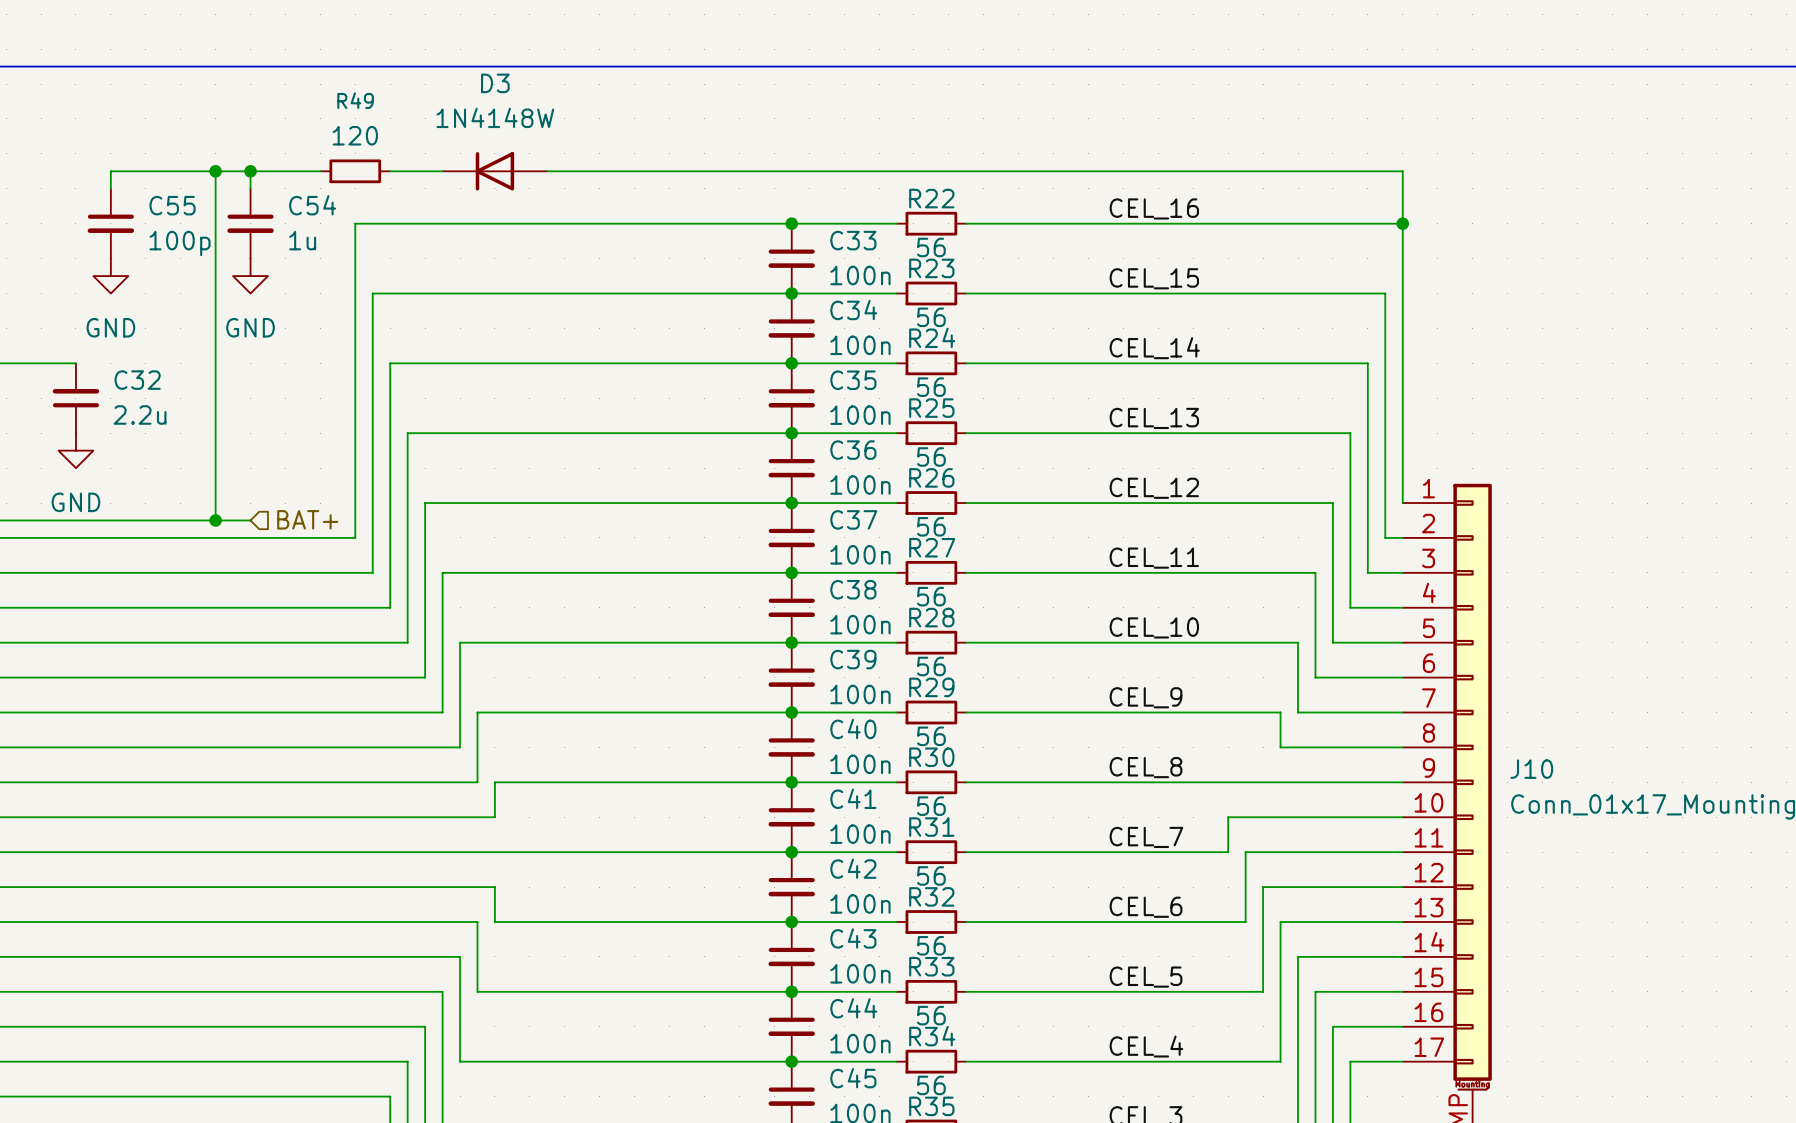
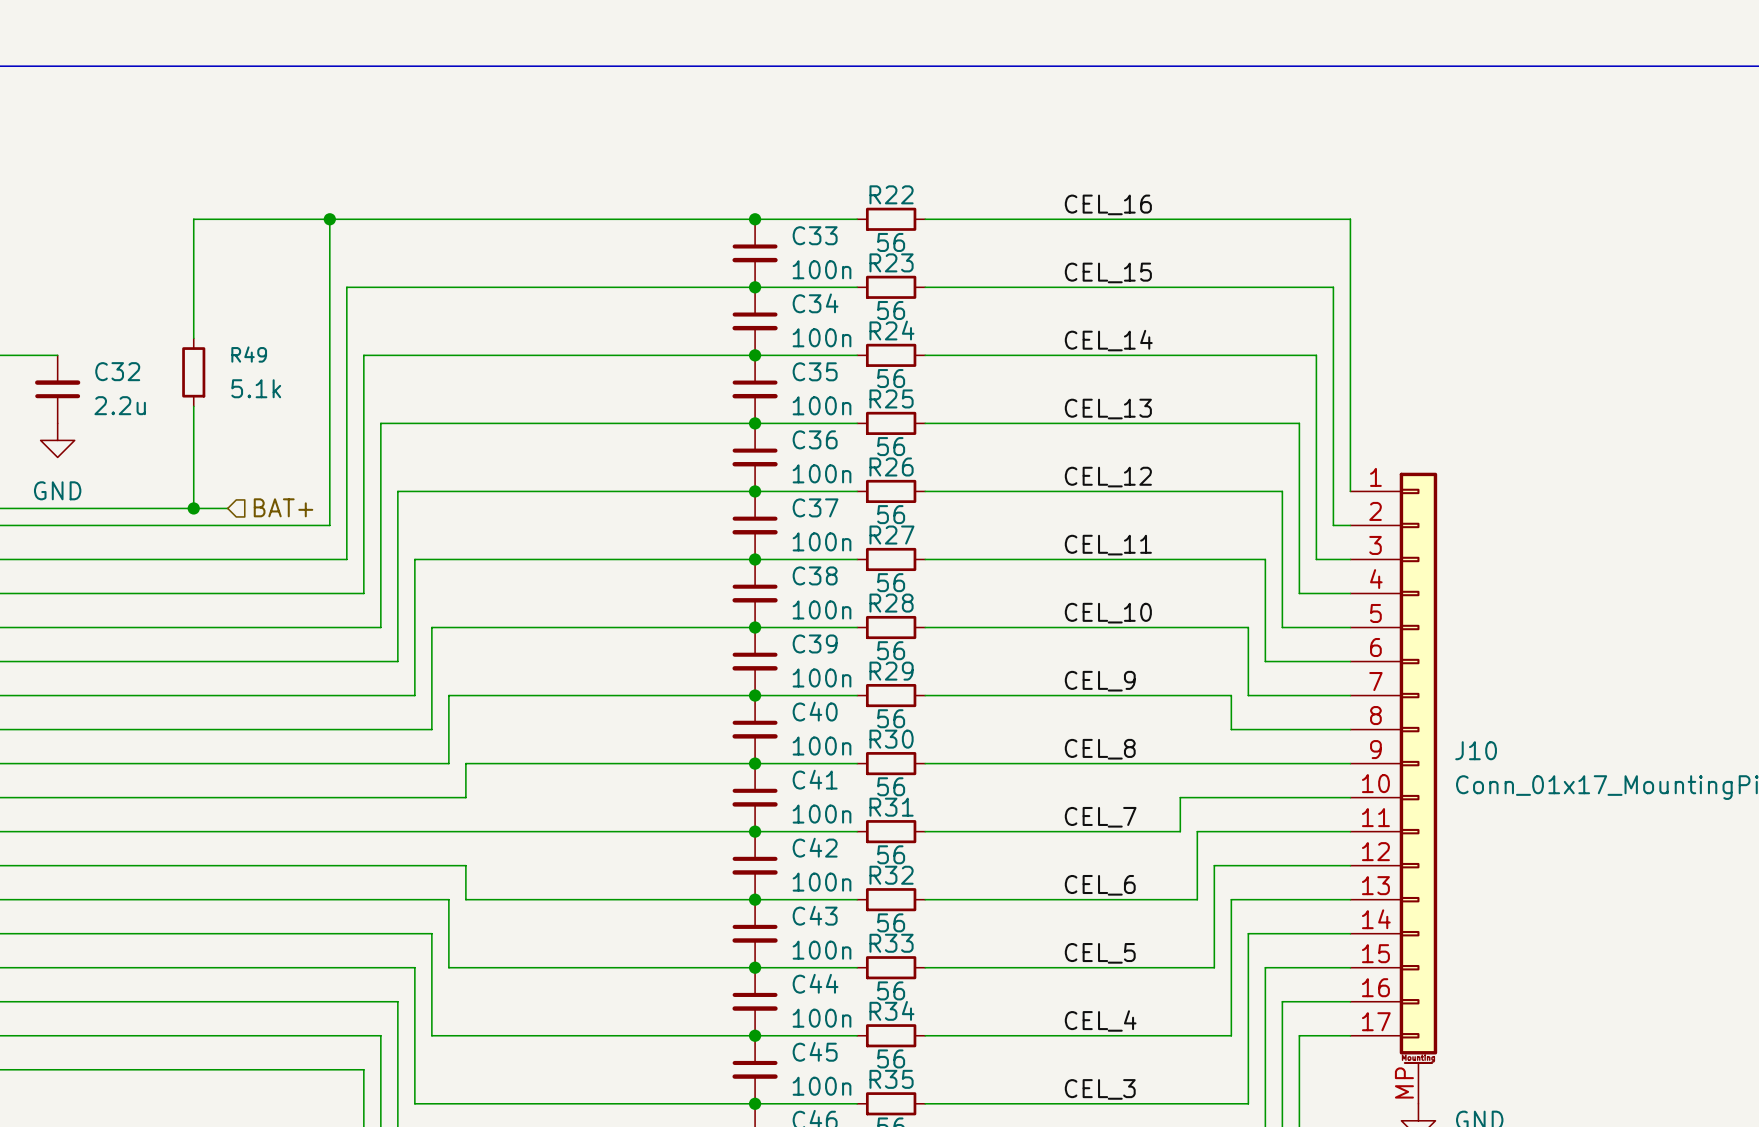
R49 value: 120 (355, 135) -> 5.1k (256, 388)
wire: (215, 171) (215, 223) -> (329, 219) (193, 219)
junction: (215, 171) -> none
wire: (250, 171) (250, 188) -> none
junction: (250, 171) -> none
wire: (320, 171) (110, 171) (110, 188) -> none
R49 rotation: 0° (355, 171) -> 90° clockwise (193, 372)
R49 position: (355, 171) -> (193, 372)
wire: (390, 171) (442, 171) -> none
D3: 1N4148W (494, 171) -> none
wire: (547, 171) (1402, 171) (1402, 223) -> none
C55: 100p (110, 223) -> none
C54: 1u (250, 223) -> none
junction: none -> (329, 219)
junction: (1402, 223) -> none
power symbol: GND (110, 276) -> none
power symbol: GND (250, 276) -> none
wire: (215, 345) (215, 415) -> none

